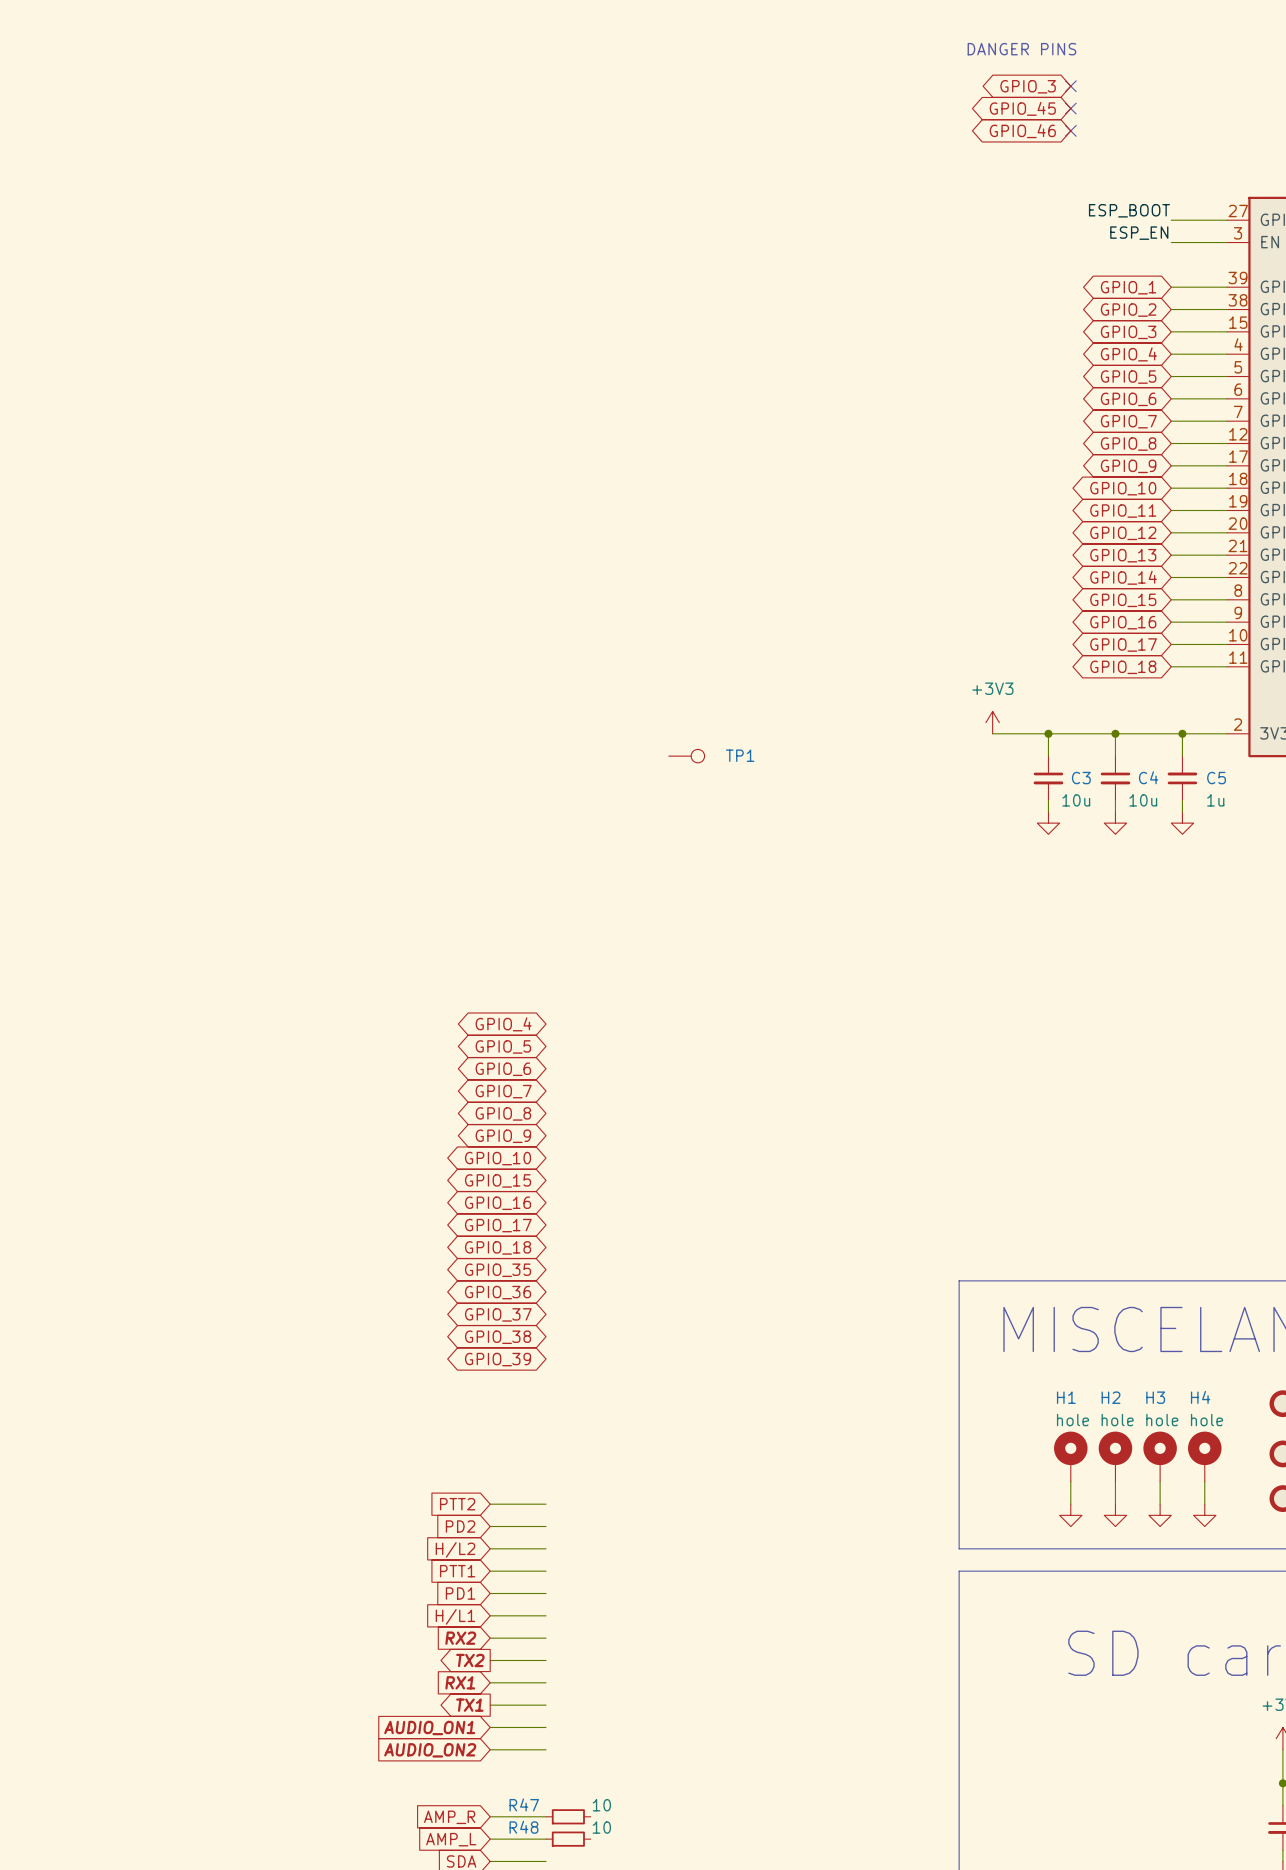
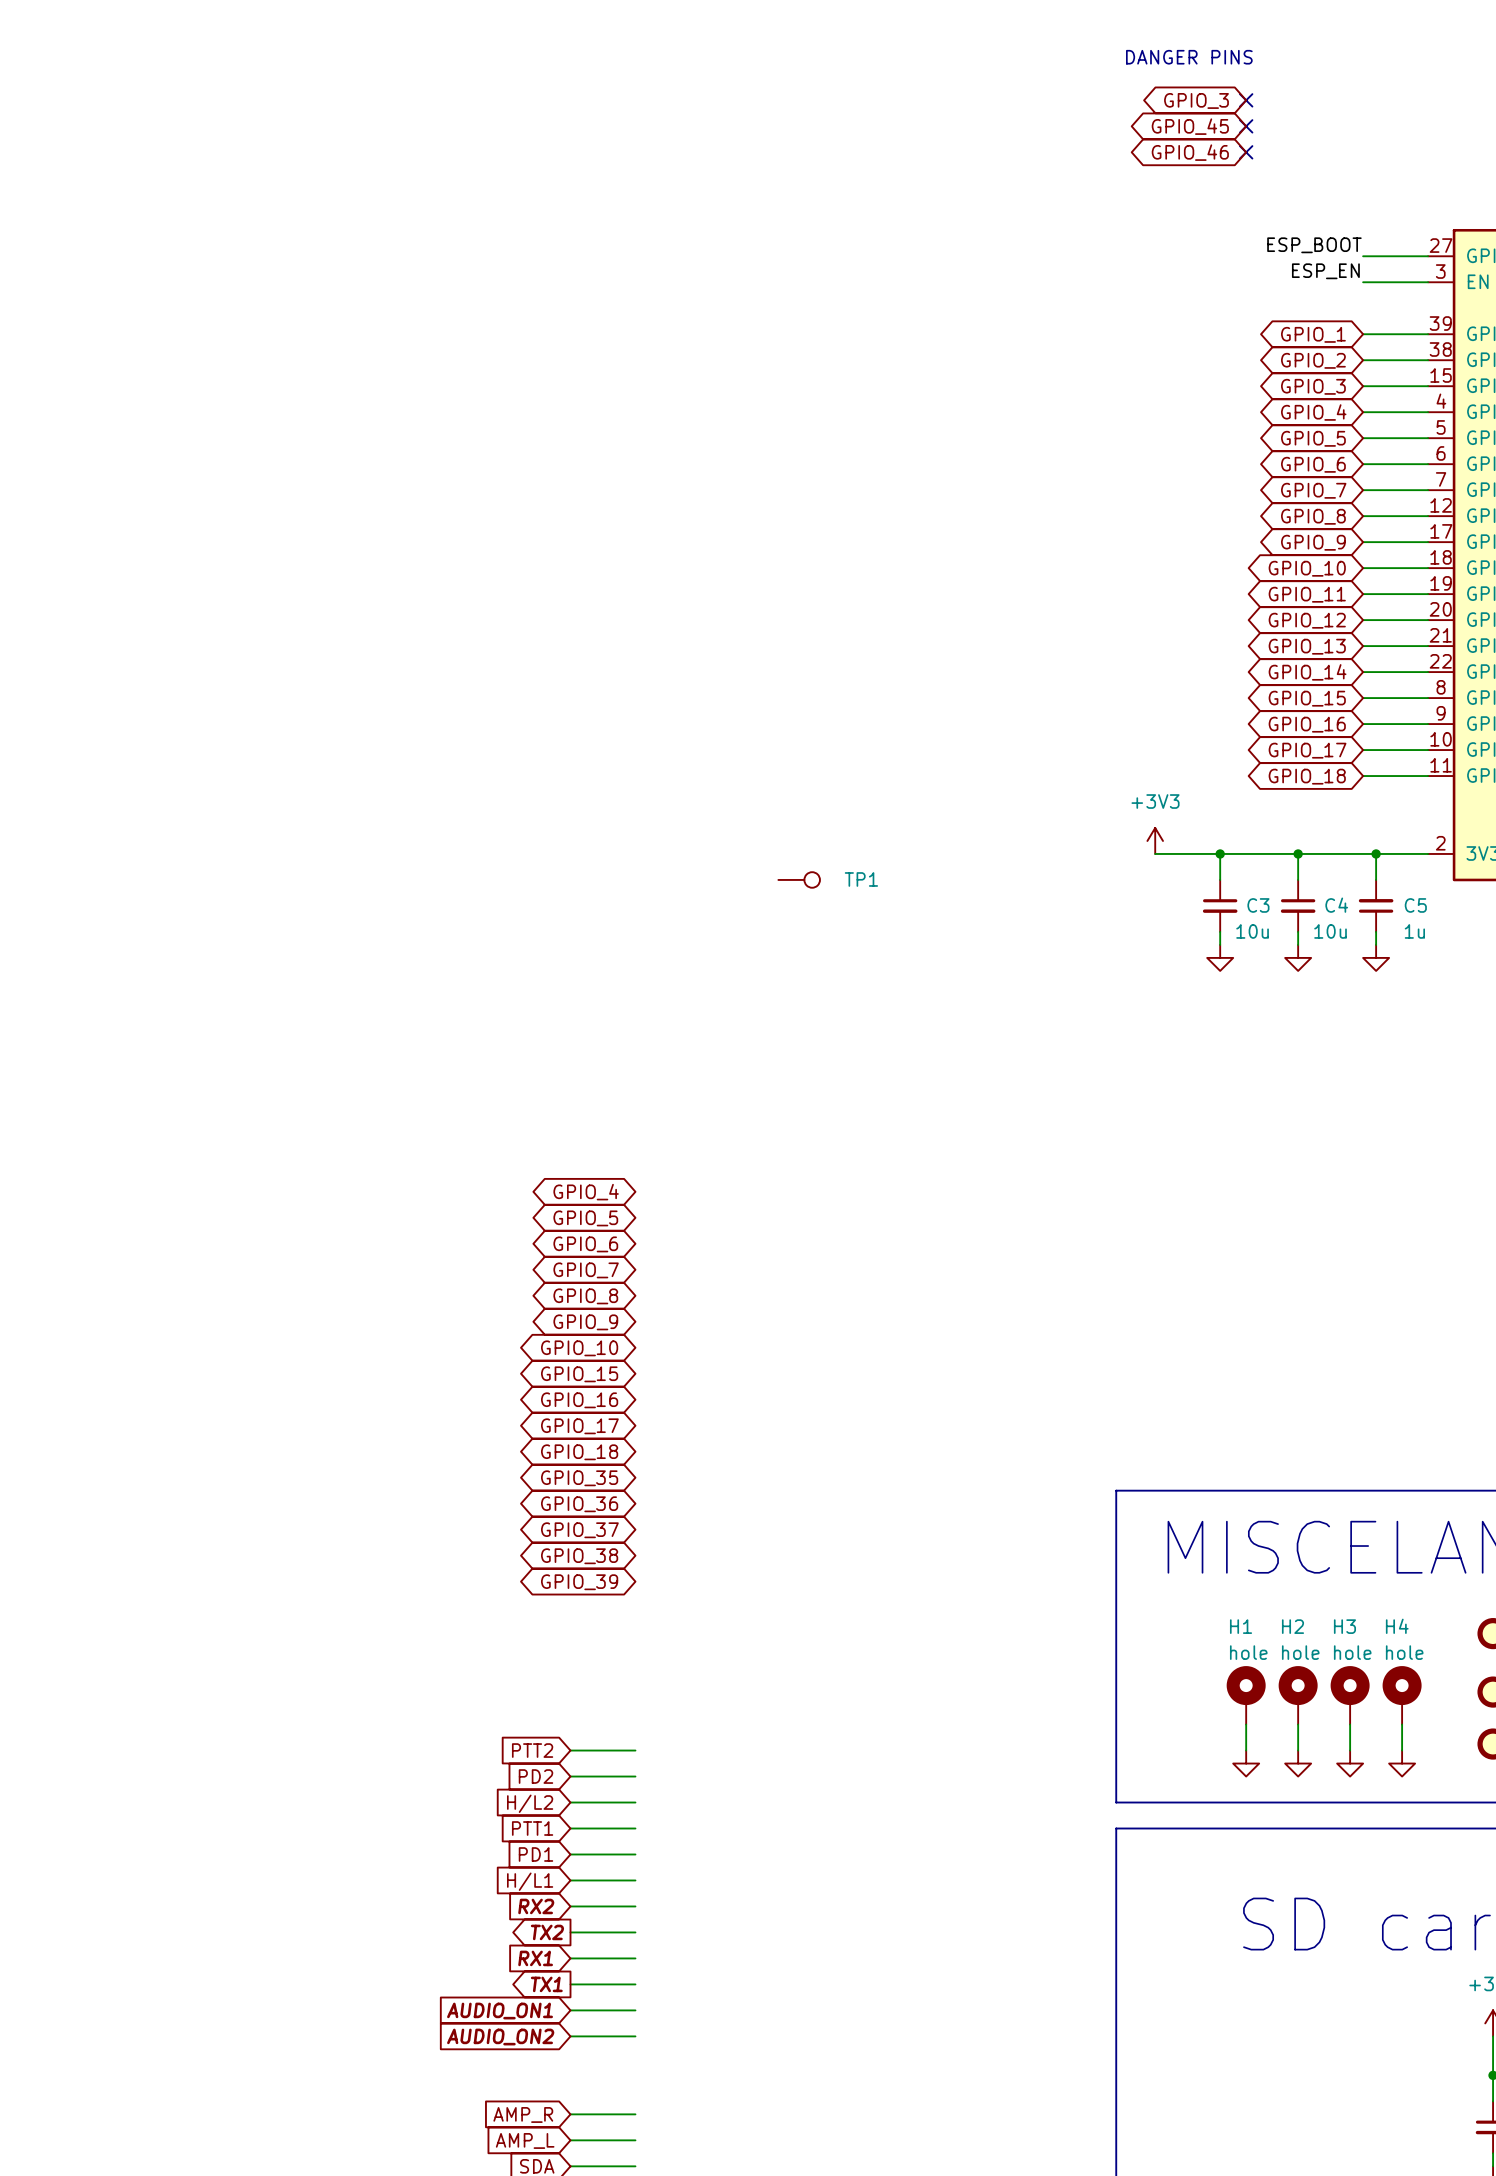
R47: 10 (568, 1816) -> none
R48: 10 (568, 1839) -> none

